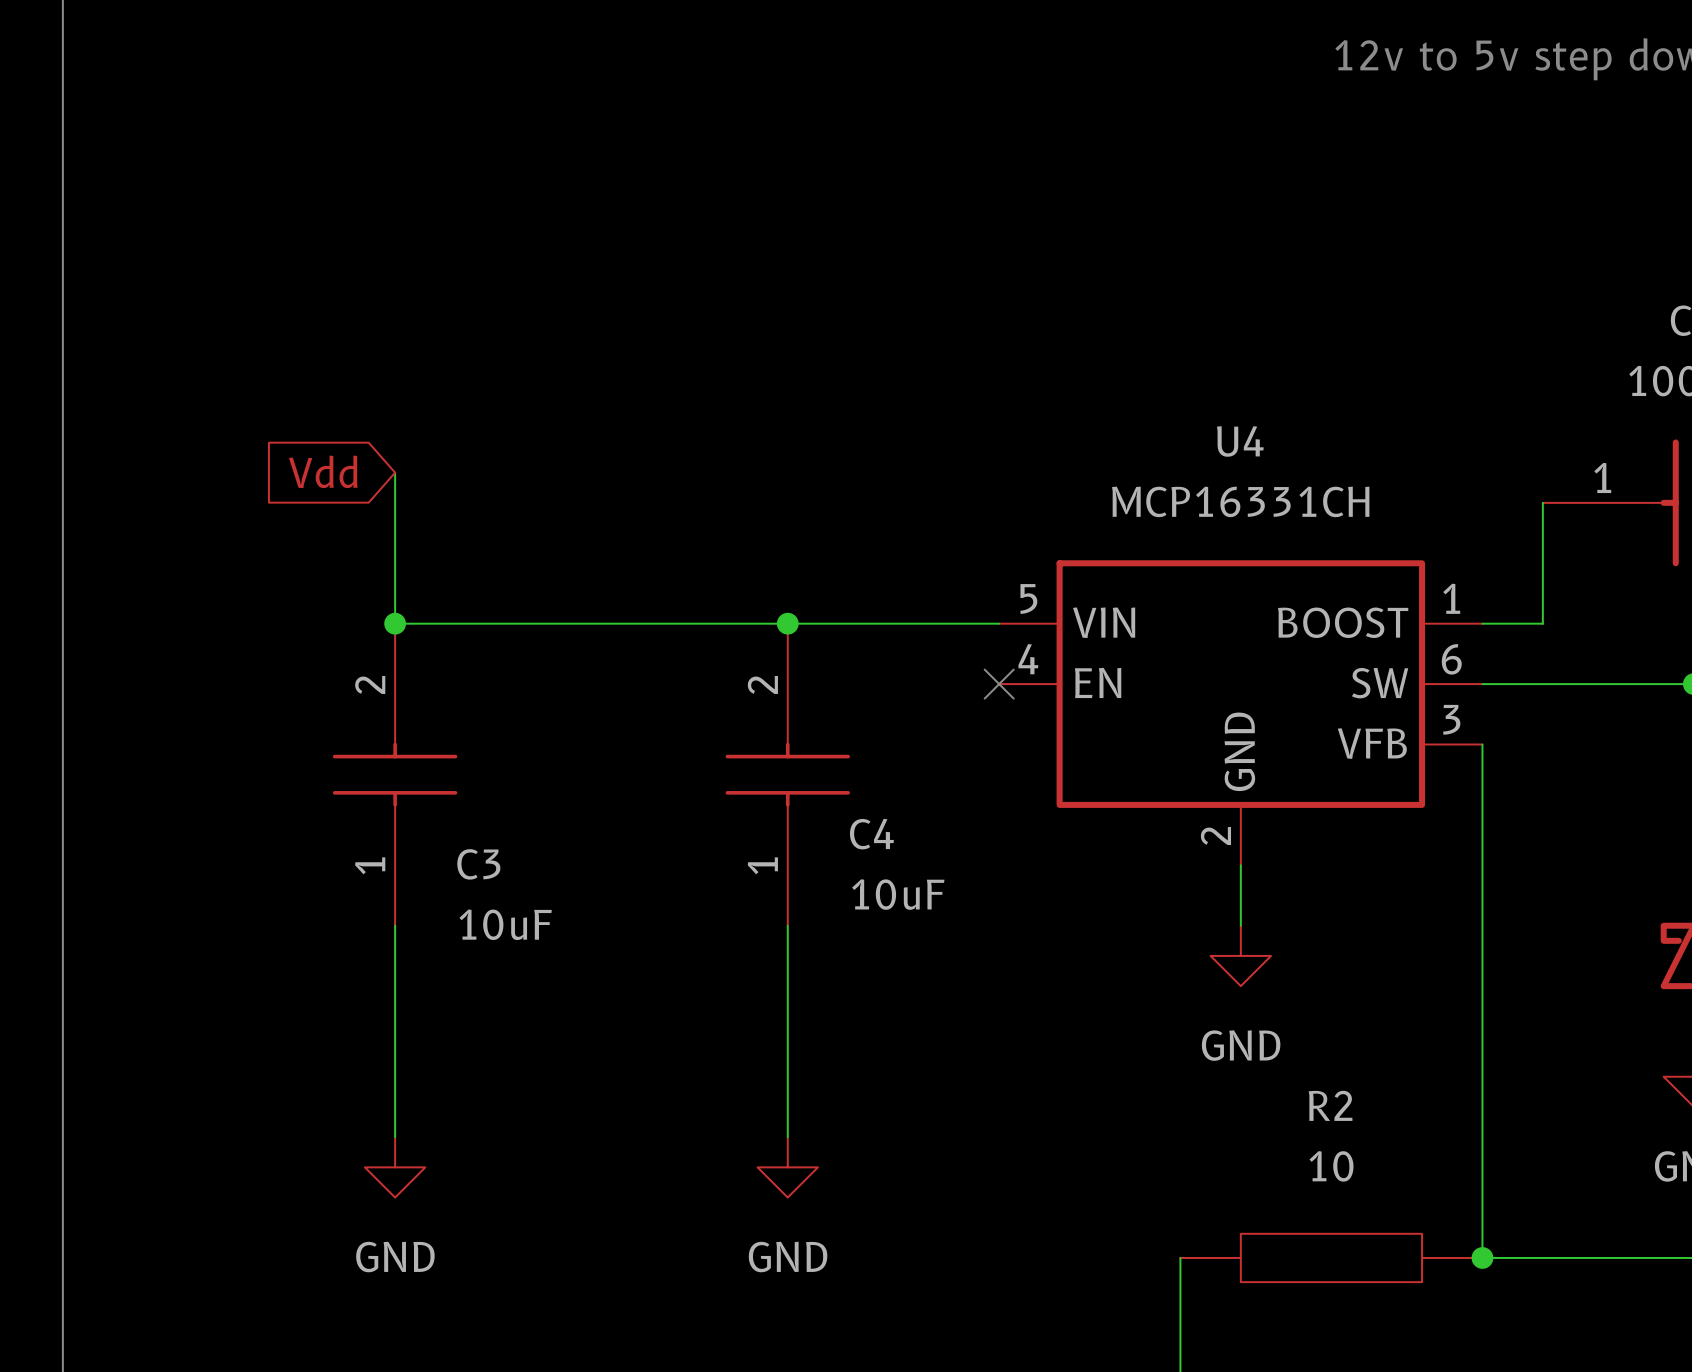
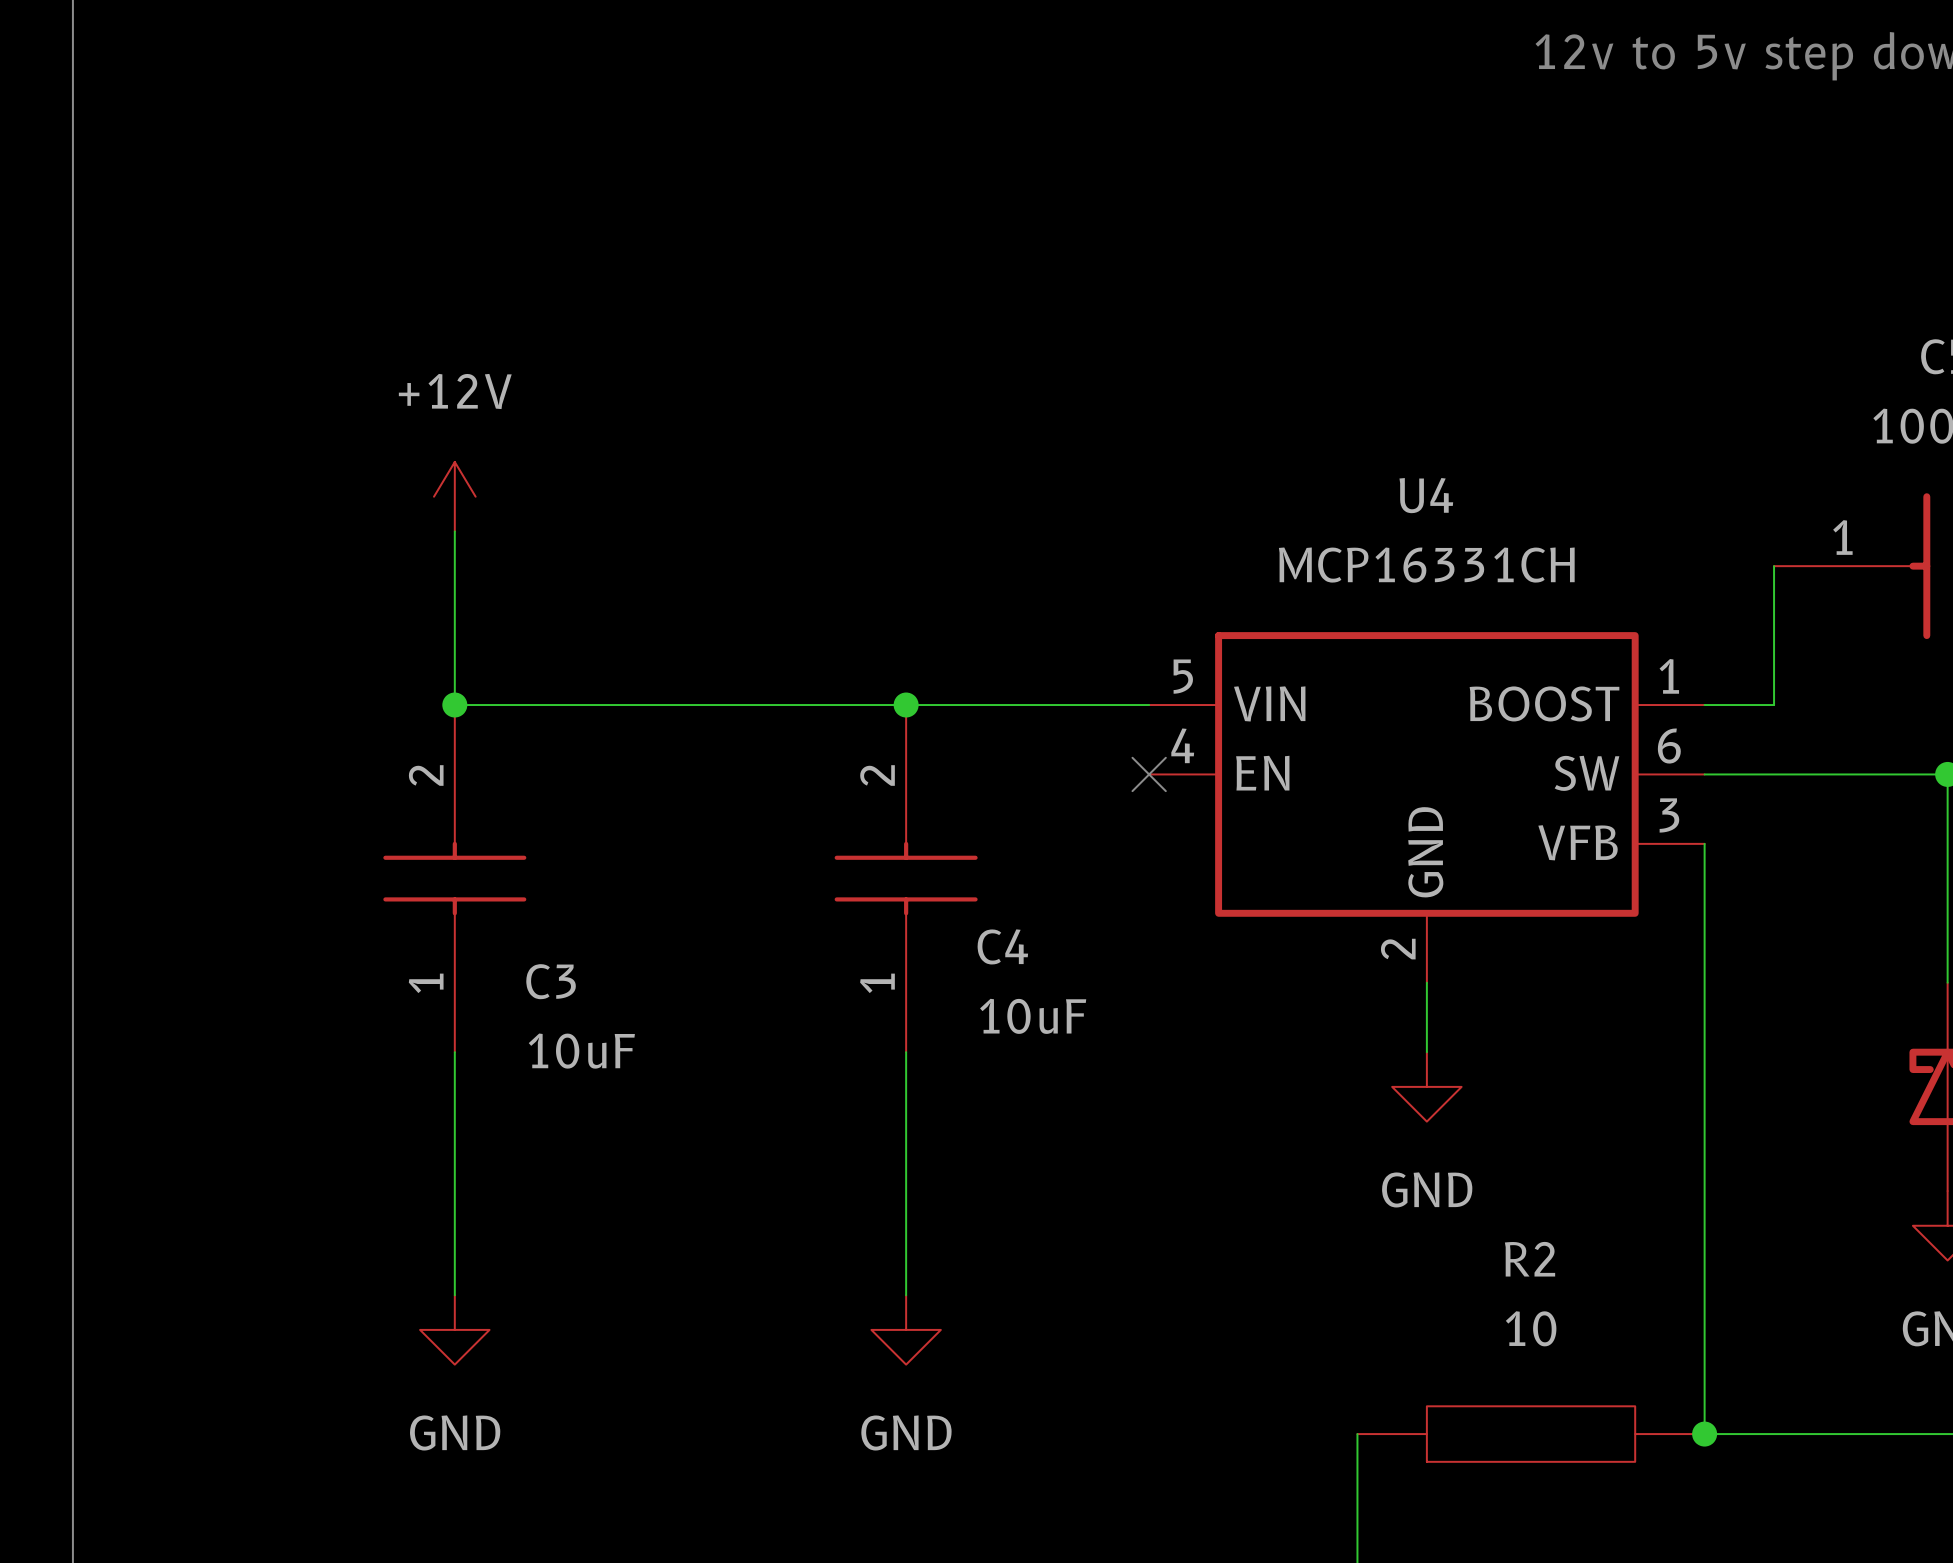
power symbol: none -> +12V (454, 496)
global label: Vdd (323, 471) -> none

